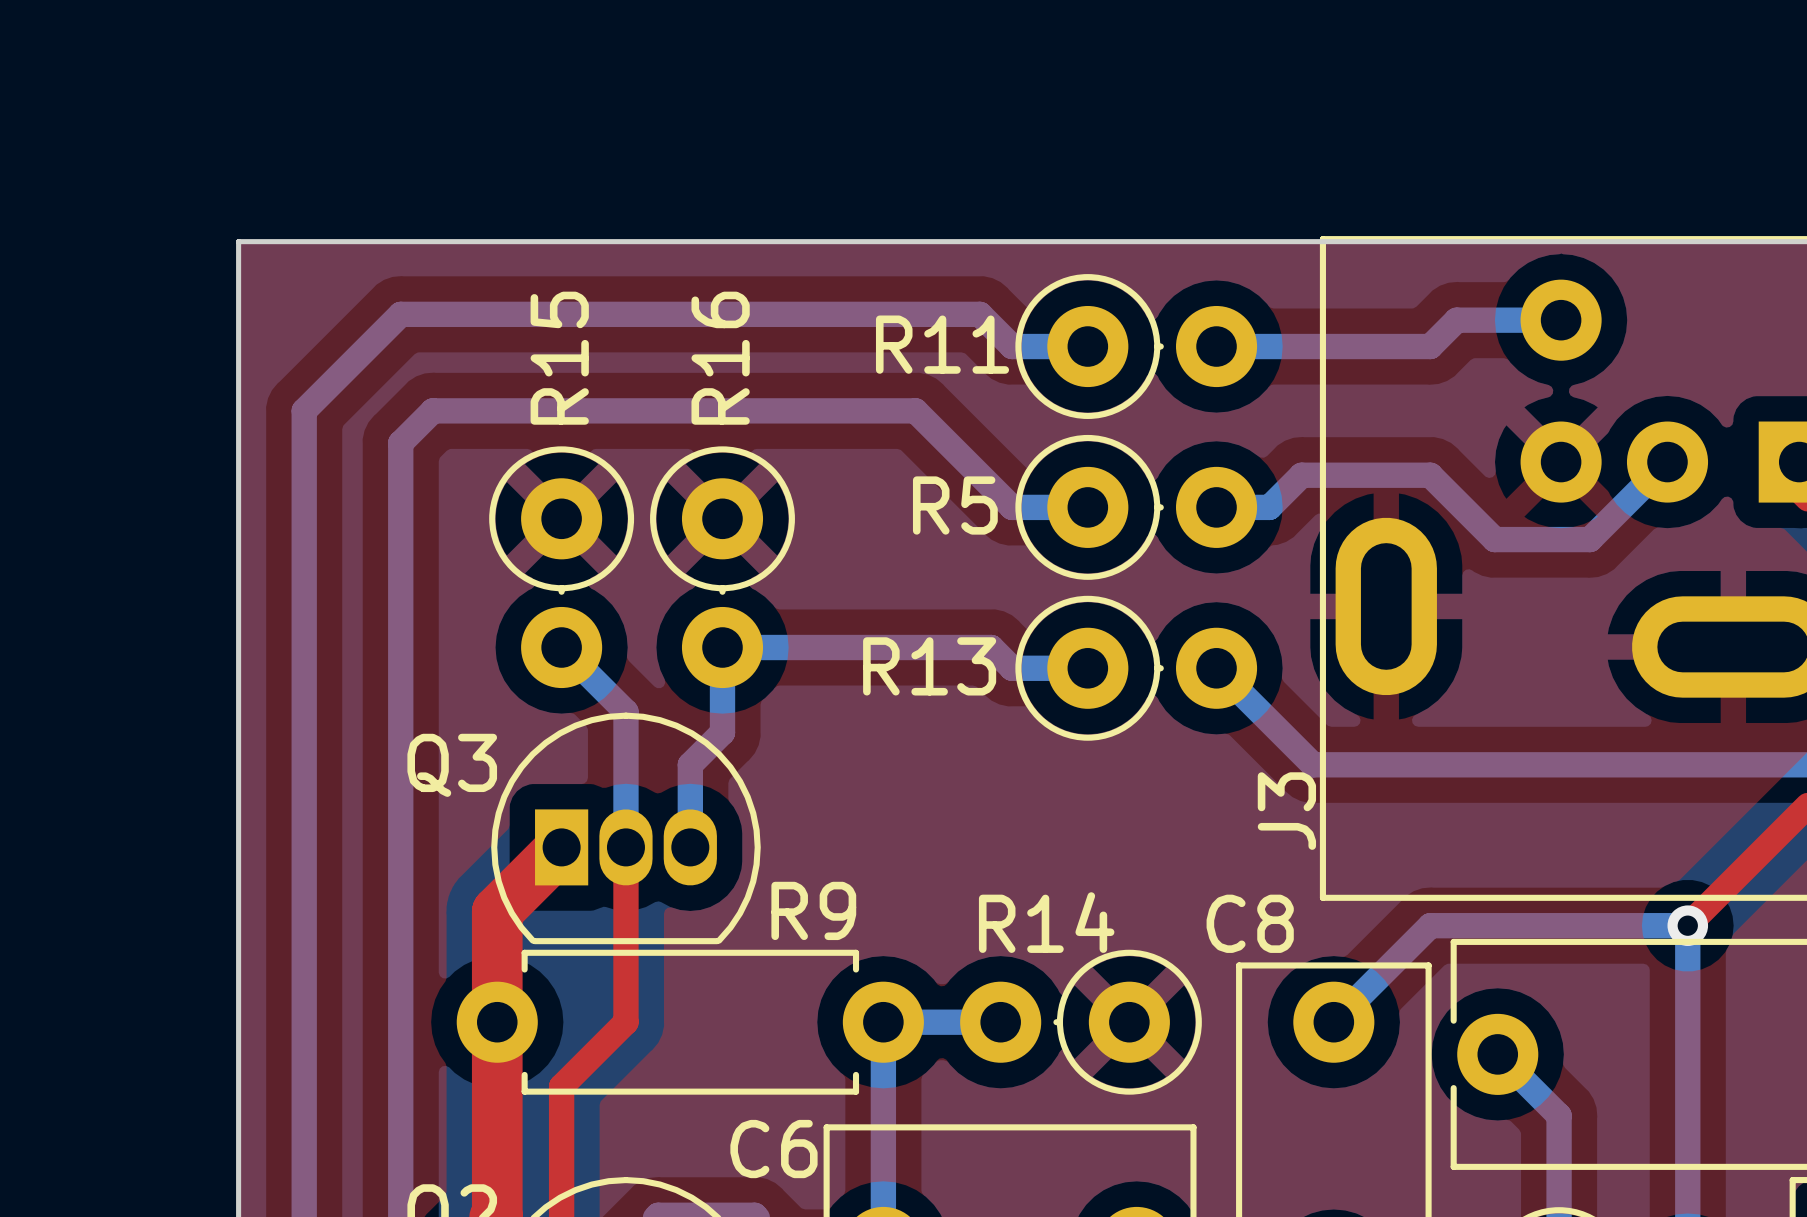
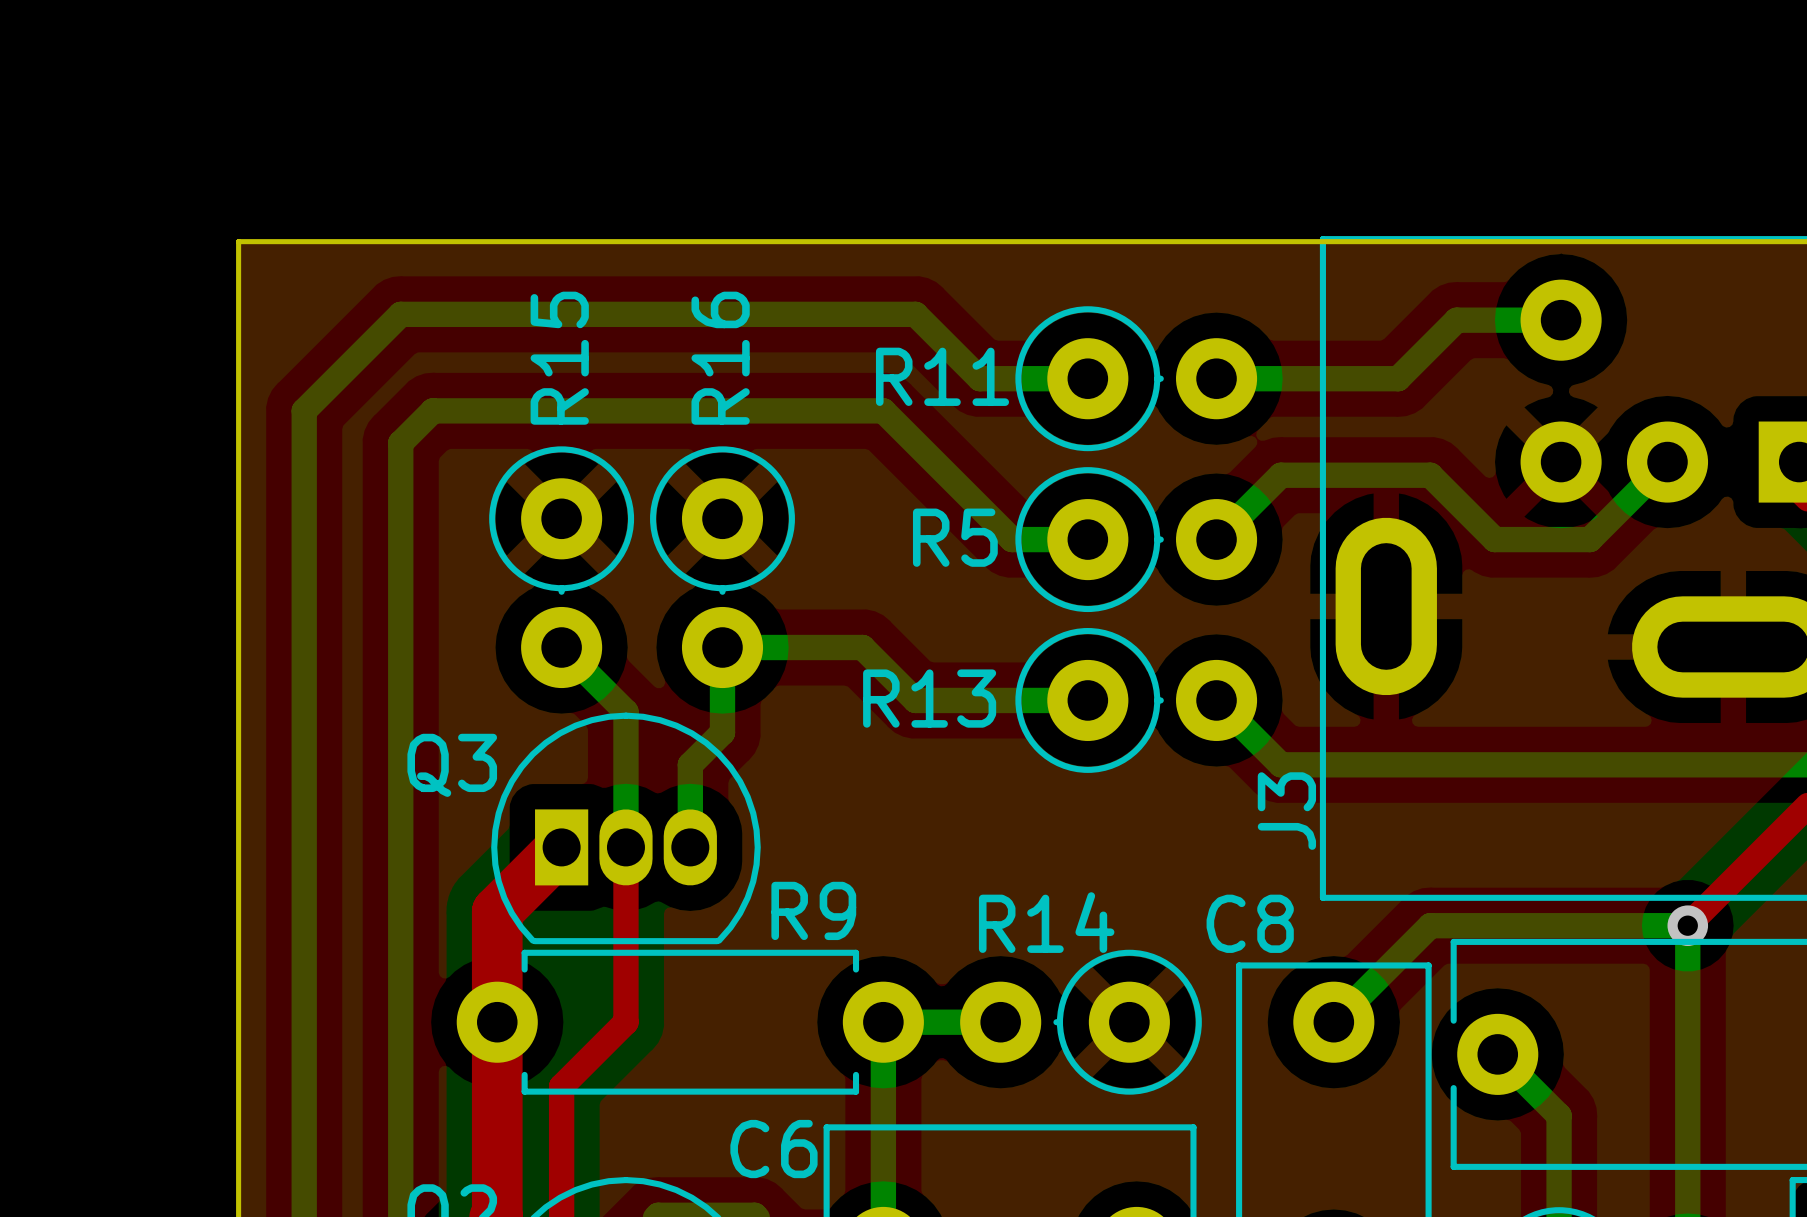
bottom track: (915, 314) (979, 314) (1012, 346) (1087, 346) -> (915, 314) (979, 378) (1087, 378)
R11 position: (1136, 346) -> (1136, 378)
bottom track: (1216, 346) (1430, 346) -> (1216, 378) (1398, 378) (1430, 346)
bottom track: (883, 410) (915, 410) (1012, 507) (1087, 507) -> (883, 410) (1012, 539) (1087, 539)
bottom track: (1301, 475) (1269, 507) (1216, 507) -> (1301, 475) (1280, 475) (1216, 539)
R5 position: (1136, 507) -> (1136, 539)
bottom track: (862, 647) (991, 647) (1012, 668) (1087, 668) -> (862, 647) (915, 700) (1087, 700)
R13 position: (1136, 668) -> (1136, 700)
bottom track: (1216, 668) (1313, 764) -> (1216, 700) (1280, 764) (1313, 764)

